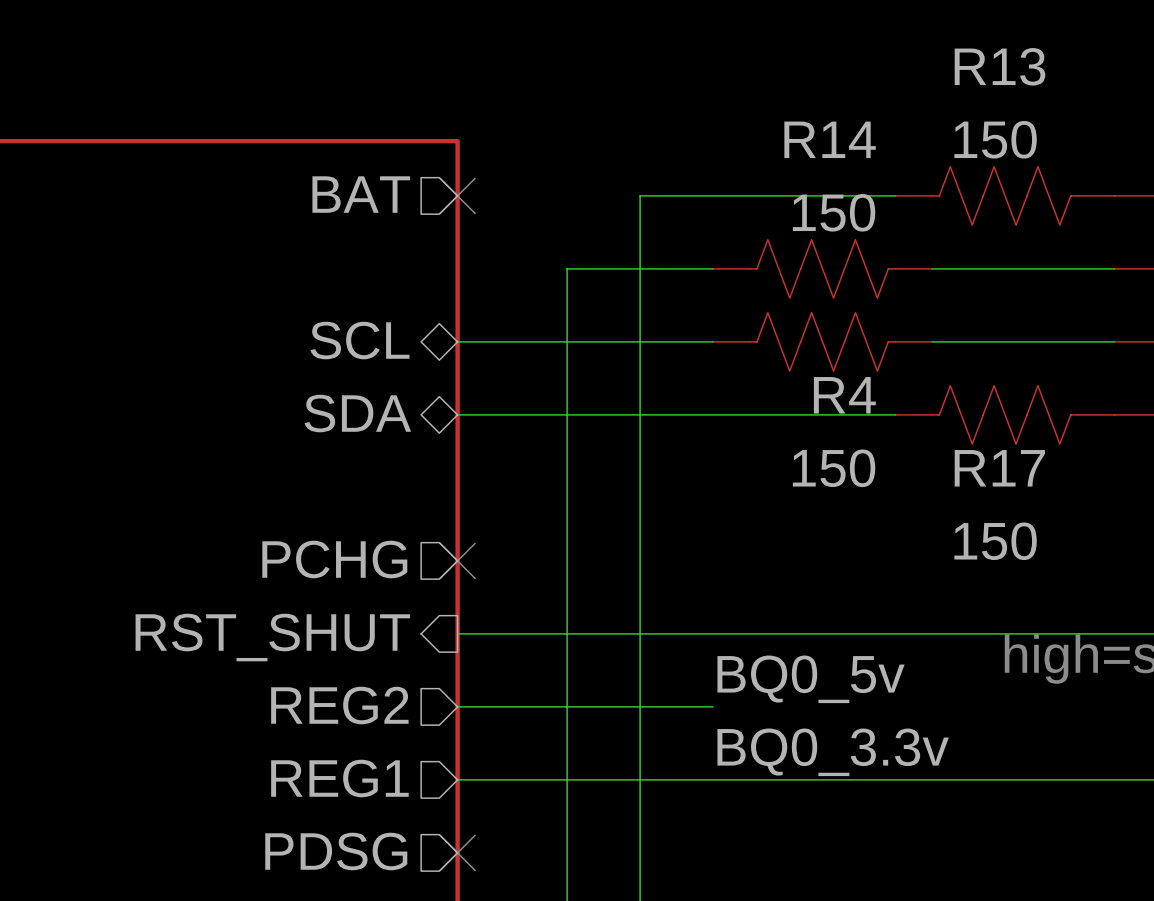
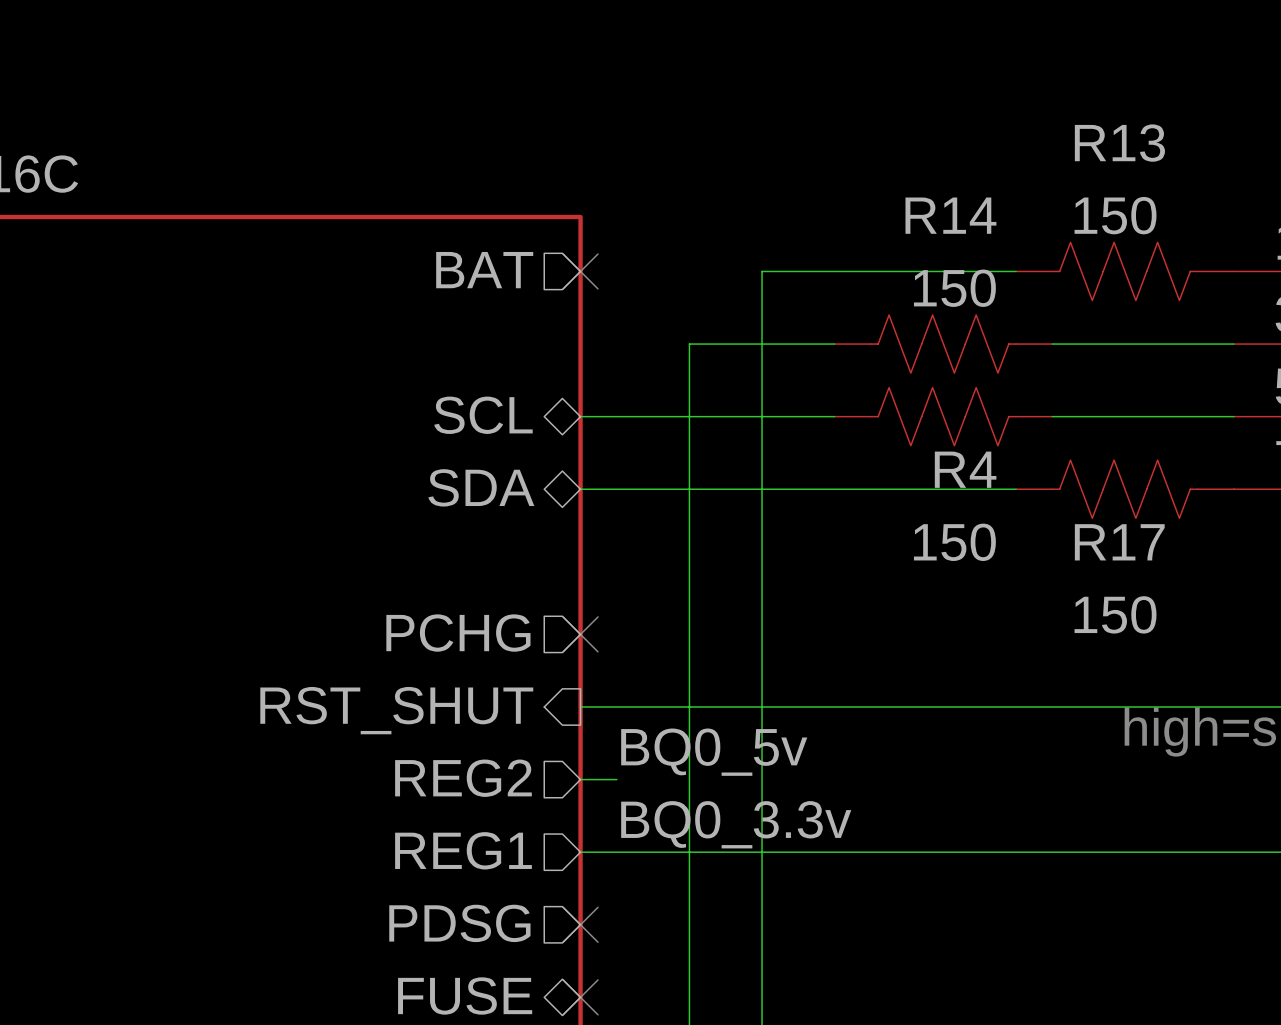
label position: BQ0_5v (811, 679) -> BQ0_5v (714, 752)
wire: (494, 706) (713, 706) -> none
label position: BQ0_3.3v (833, 752) -> BQ0_3.3v (736, 824)

